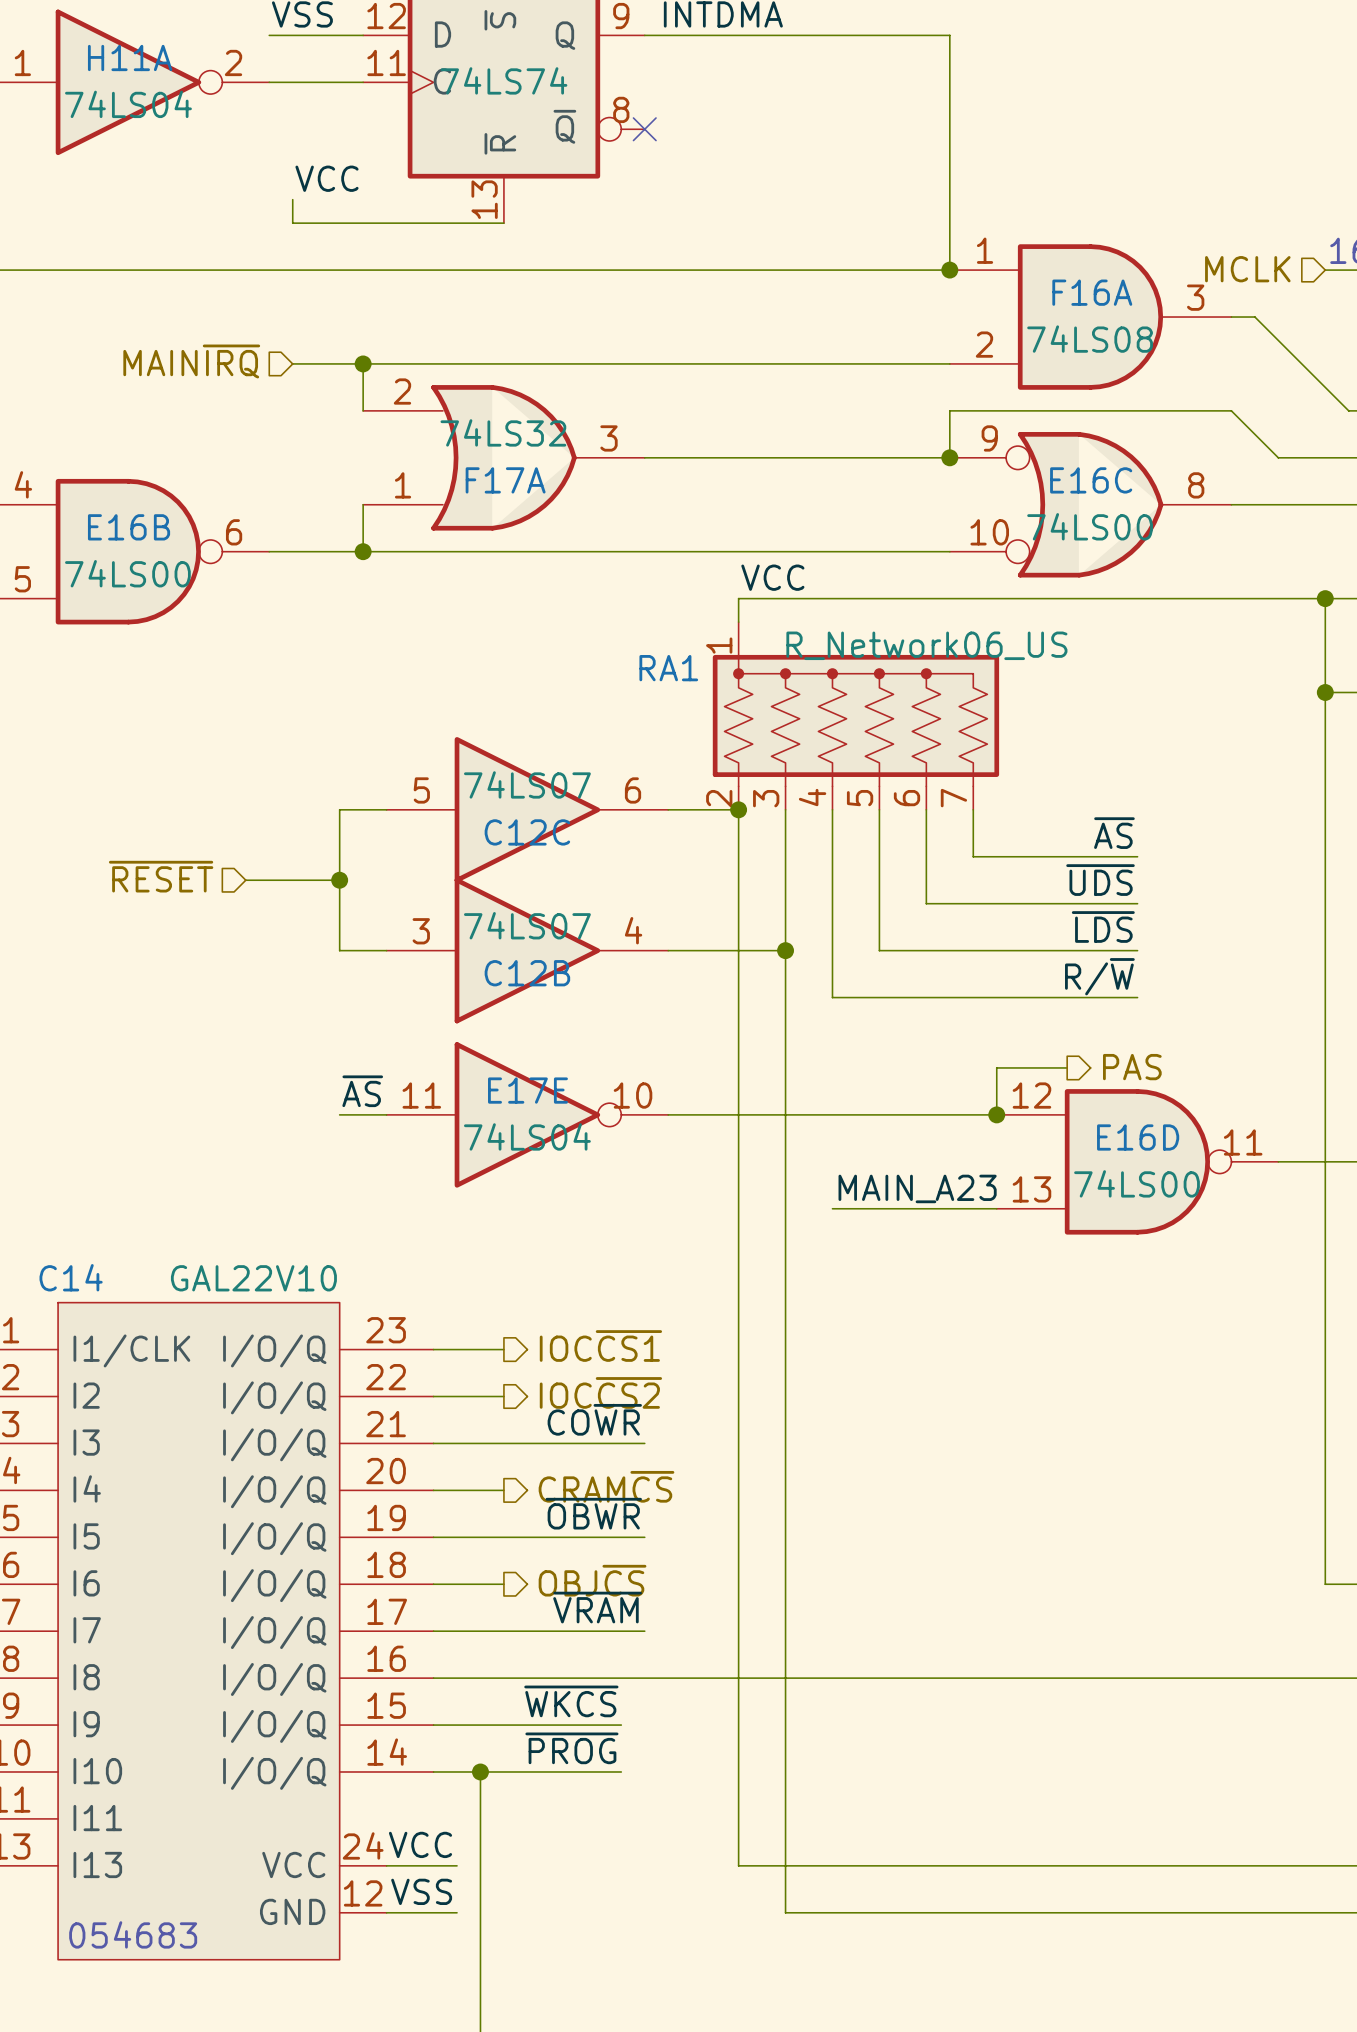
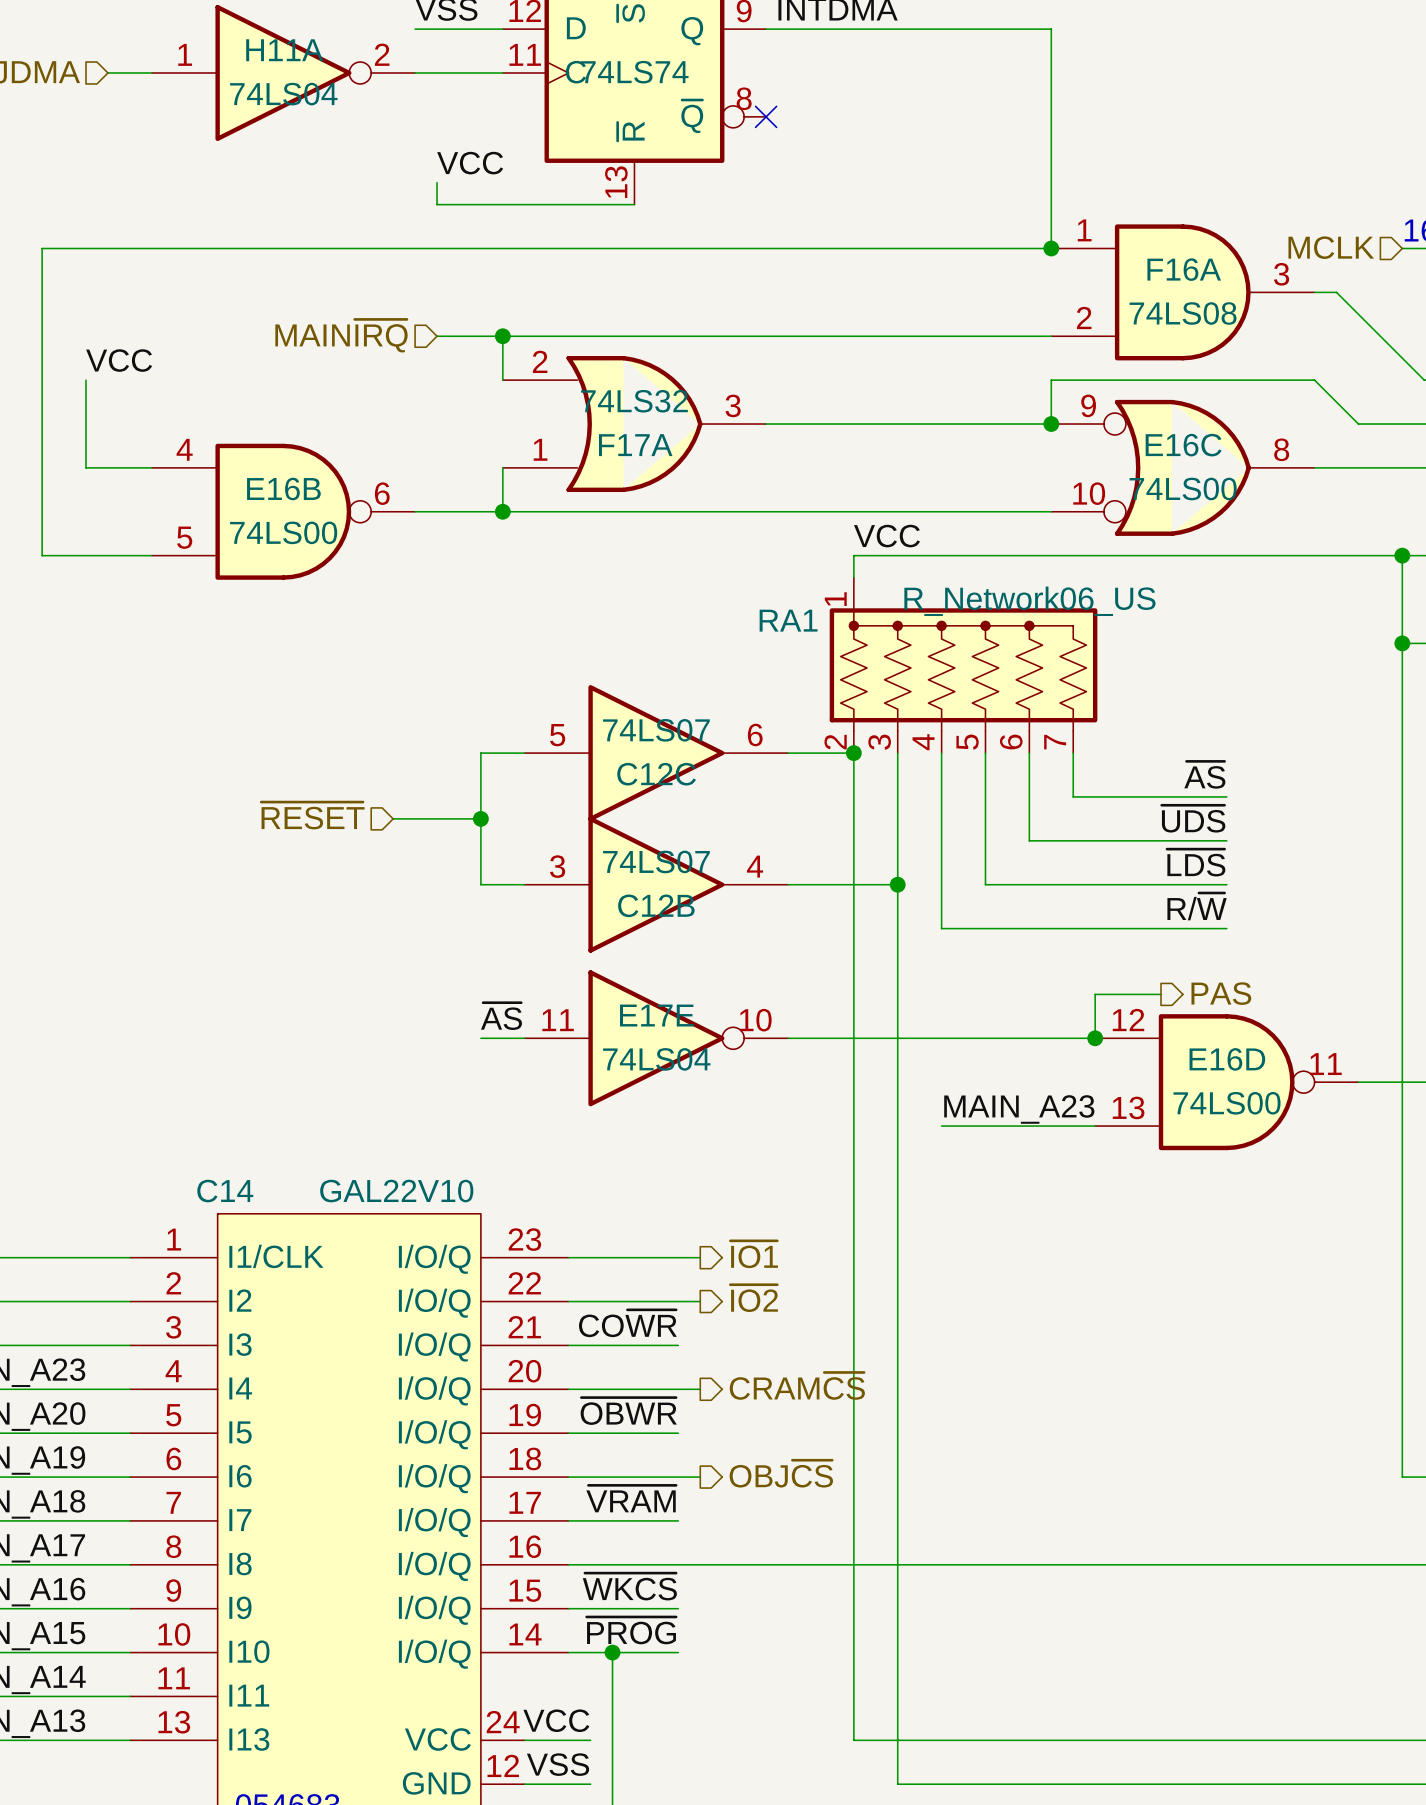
hierarchical label: IOC~{CS1} (600, 1346) -> none
hierarchical label: none -> ~{IO1} (754, 1254)
hierarchical label: IOC~{CS2} (600, 1392) -> none
hierarchical label: none -> ~{IO2} (754, 1298)
label position: CO~{WR} (594, 1419) -> CO~{WR} (627, 1323)
wire: (550, 1443) (644, 1443) -> none
hierarchical label position: CRAM~{CS} (606, 1486) -> CRAM~{CS} (797, 1386)
wire: none -> (634, 1389) (700, 1389)
label position: ~{OBWR} (593, 1513) -> ~{OBWR} (628, 1411)
wire: (550, 1537) (644, 1537) -> none
hierarchical label position: OBJ~{CS} (592, 1580) -> OBJ~{CS} (781, 1473)
wire: none -> (634, 1477) (700, 1477)
label position: ~{VRAM} (597, 1607) -> ~{VRAM} (631, 1498)
wire: (550, 1631) (644, 1631) -> none
label position: ~{WKCS} (571, 1701) -> ~{WKCS} (629, 1586)
wire: (550, 1725) (621, 1725) -> (634, 1257) (700, 1257)
label position: ~{PROG} (571, 1748) -> ~{PROG} (631, 1630)
wire: (550, 1771) (621, 1771) -> (634, 1301) (700, 1301)

